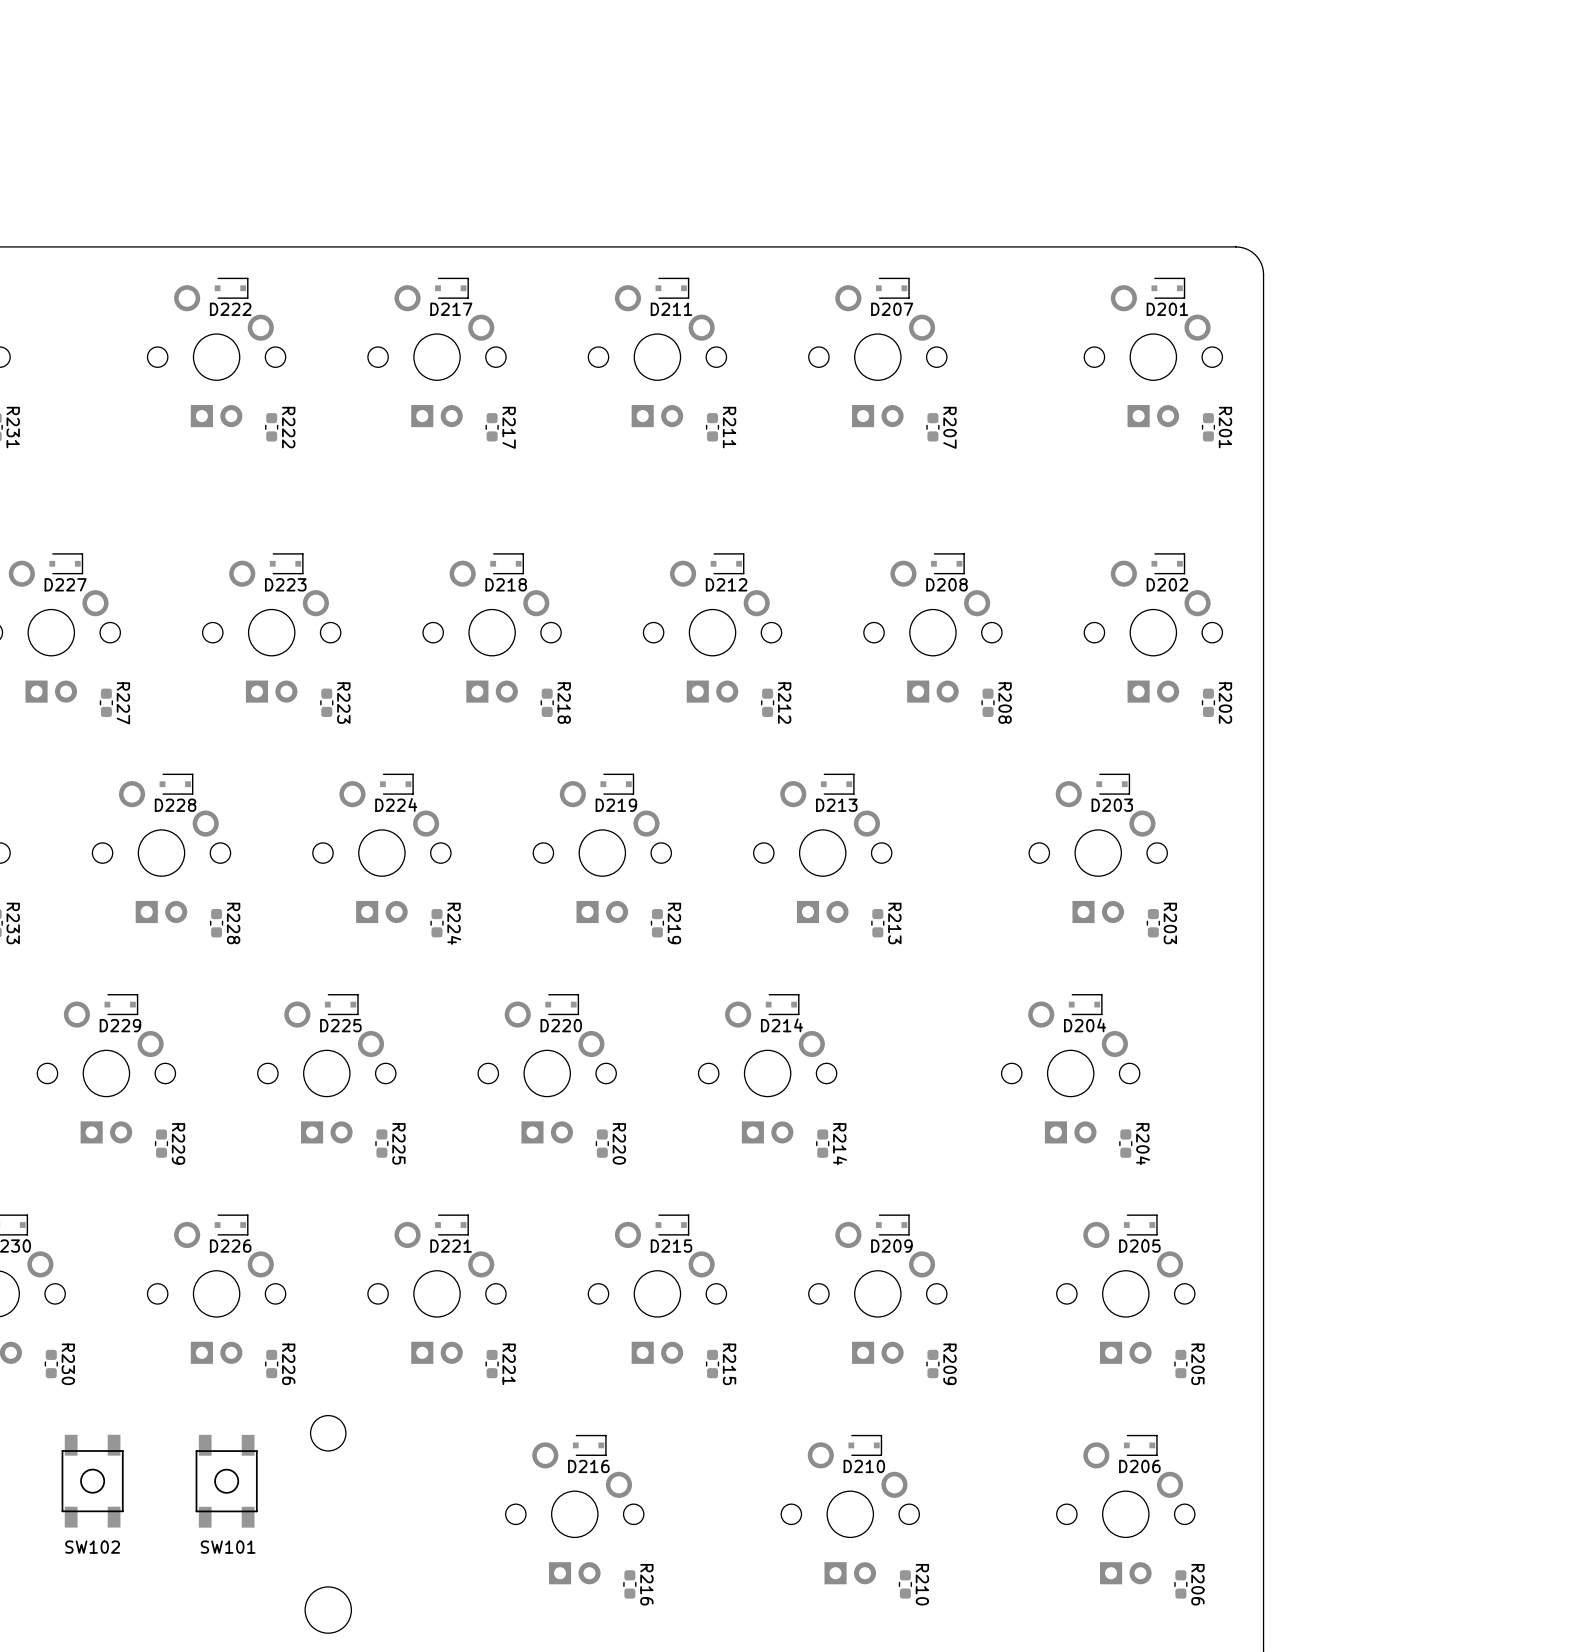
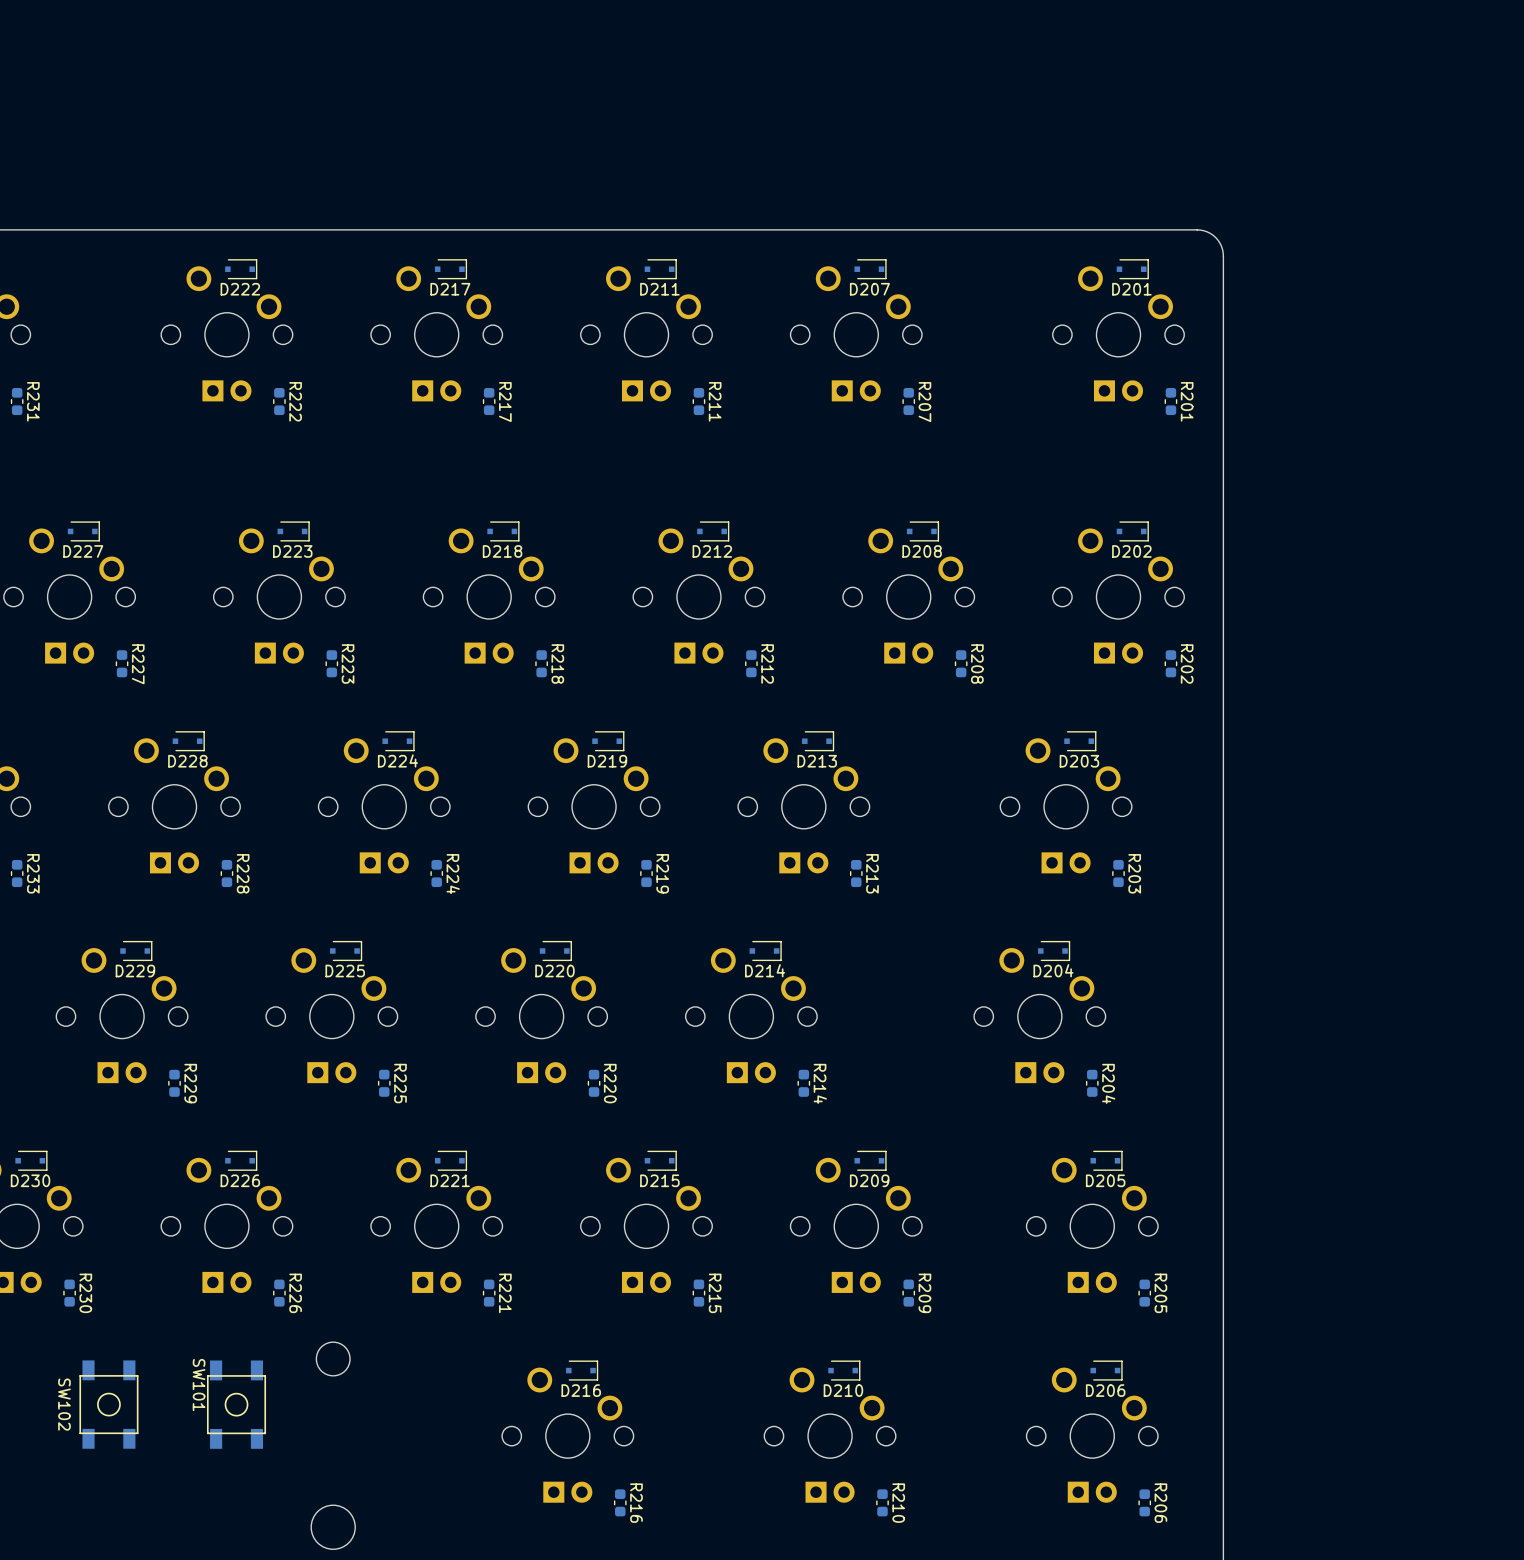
SW102 name rotation: 0° (92, 1547) -> 90° clockwise (64, 1404)
SW102 name position: SW102 (92, 1547) -> SW102 (64, 1404)
SW101 name rotation: 0° (228, 1547) -> 90° clockwise (199, 1385)
SW101 name position: SW101 (228, 1547) -> SW101 (199, 1385)

